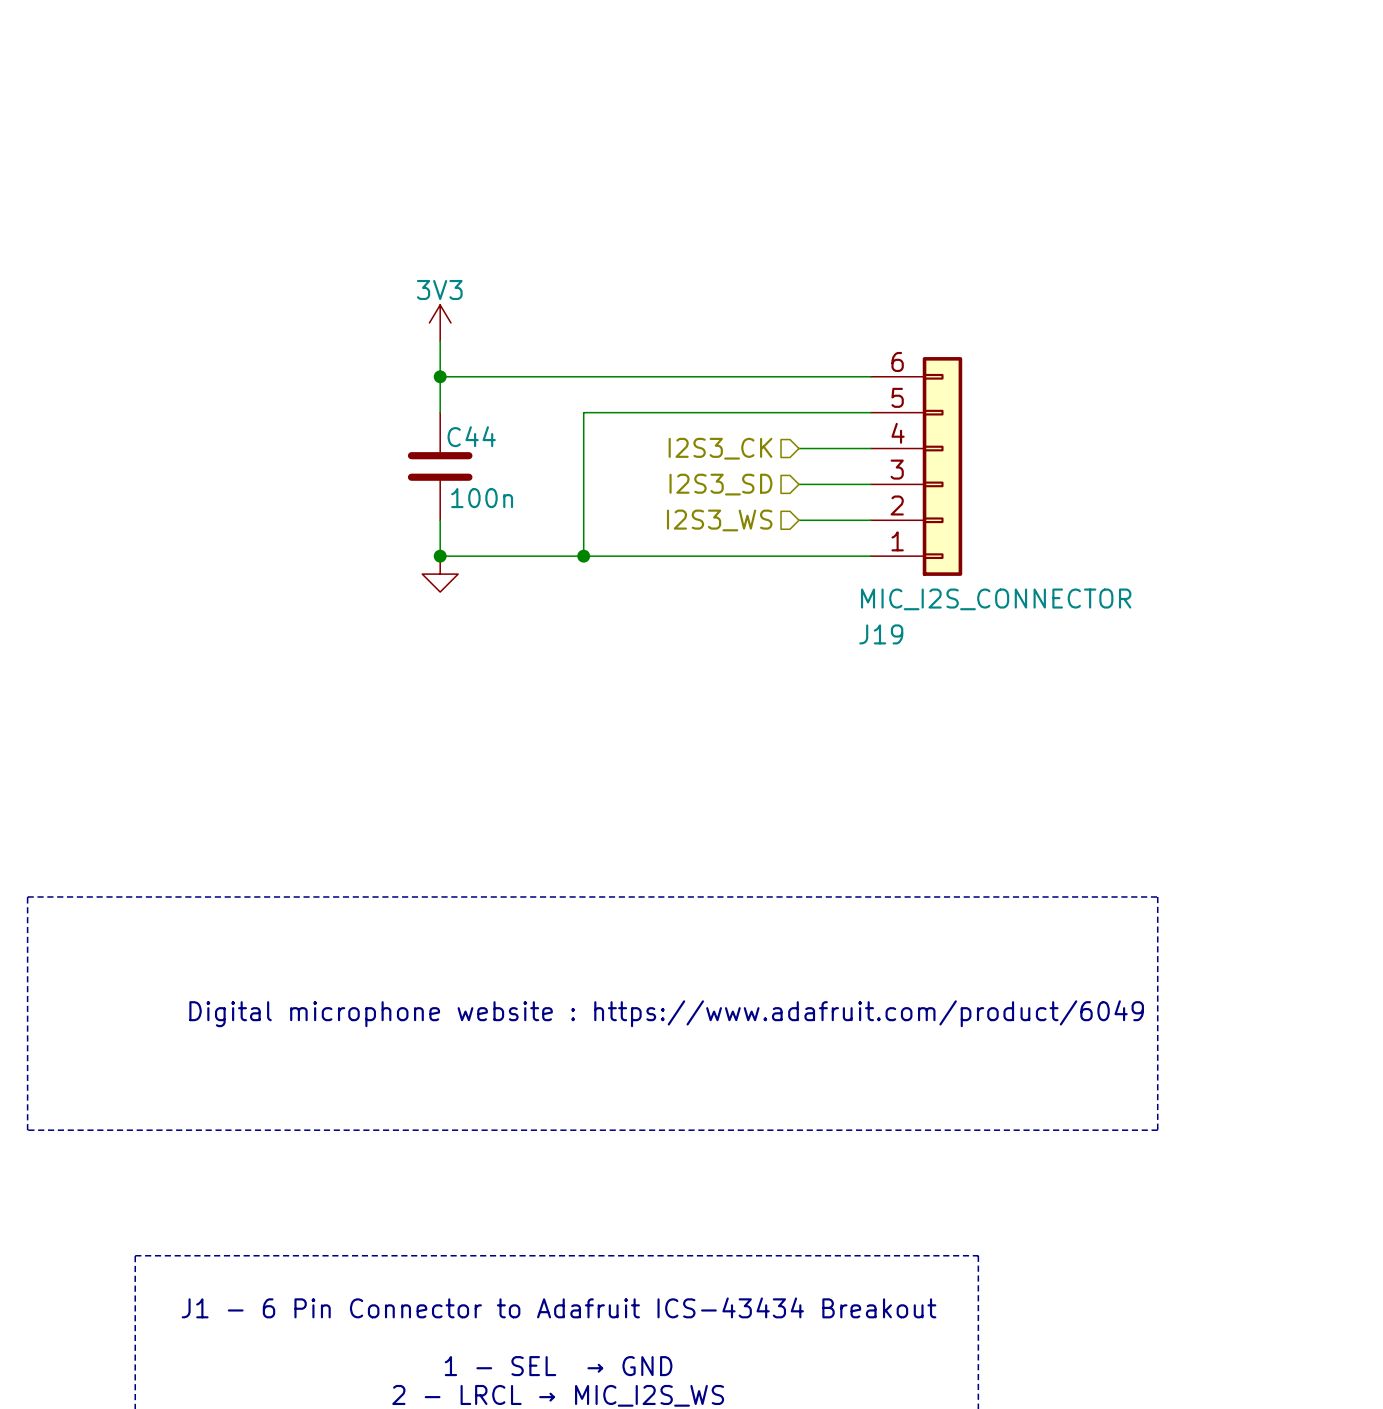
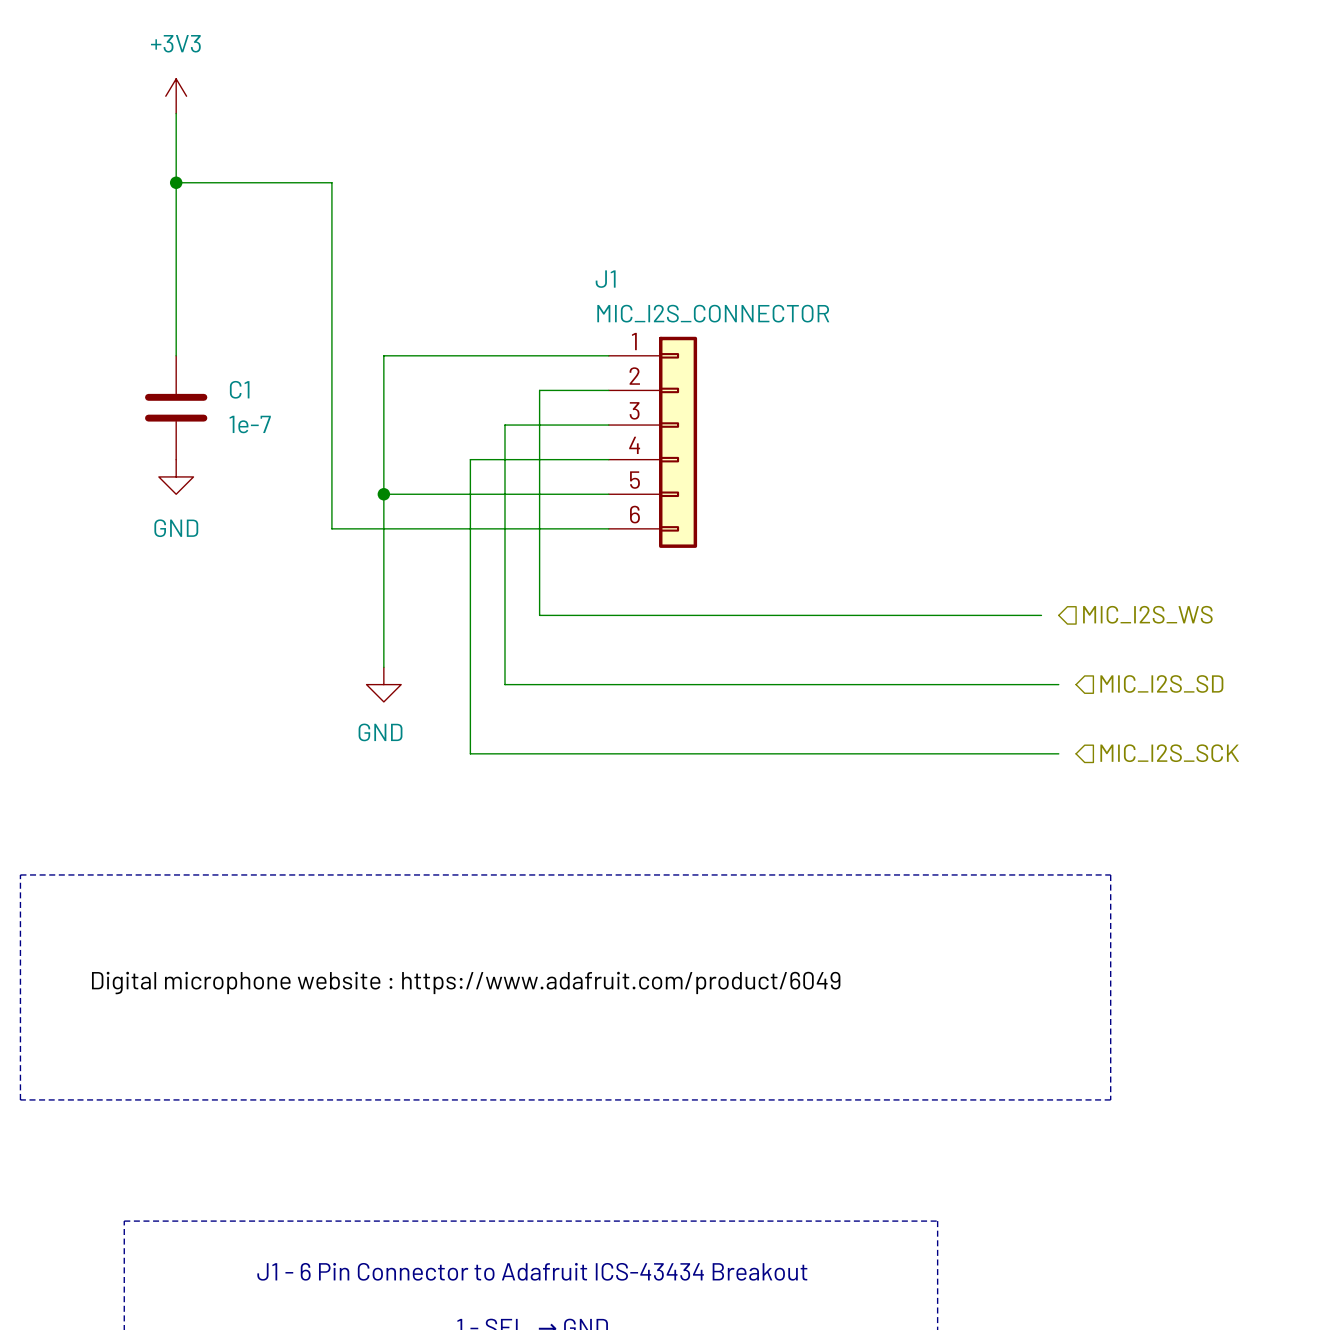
power symbol: none -> +3V3 (176, 96)
wire: none -> (176, 113) (176, 355)
wire: none -> (176, 182) (331, 182) (331, 528) (608, 528)
junction: none -> (176, 182)
power symbol: 3V3 (440, 322) -> none
wire: (440, 340) (440, 412) -> none
wire: none -> (608, 355) (383, 355) (383, 667)
wire: (440, 376) (870, 376) -> none
junction: (440, 376) -> none
wire: none -> (608, 390) (539, 390) (539, 615) (1041, 615)
C1: none -> 1e-7 (176, 407)
wire: (870, 412) (583, 412) (583, 556) -> none
wire: none -> (608, 425) (504, 425) (504, 684) (1058, 684)
J1: none -> MIC_I2S_CONNECTOR (652, 442)
hierarchical label: I2S3_CK (720, 448) -> none
wire: (798, 448) (870, 448) -> none
C44: 100n (440, 466) -> none
wire: none -> (608, 459) (470, 459) (470, 753) (1058, 753)
J19: MIC_I2S_CONNECTOR (916, 466) -> none
power symbol: none -> GND (176, 476)
hierarchical label: I2S3_SD (720, 484) -> none
wire: (798, 484) (870, 484) -> none
wire: none -> (383, 494) (608, 494)
wire: (440, 520) (440, 556) (870, 556) -> none
hierarchical label: I2S3_WS (719, 520) -> none
wire: (798, 520) (870, 520) -> none
junction position: (440, 556) -> (383, 494)
junction: (583, 556) -> none
power symbol: (440, 574) -> none
hierarchical label: none -> MIC_I2S_WS (1147, 614)
power symbol: none -> GND (383, 684)
hierarchical label: none -> MIC_I2S_SD (1161, 683)
hierarchical label: none -> MIC_I2S_SCK (1169, 753)
label: none -> Digital microphone website : https://www.adafruit.com/product/6049 (466, 983)
text: Digital microphone website : https://www.adafruit.com/product/6049 (666, 1013) -> none

